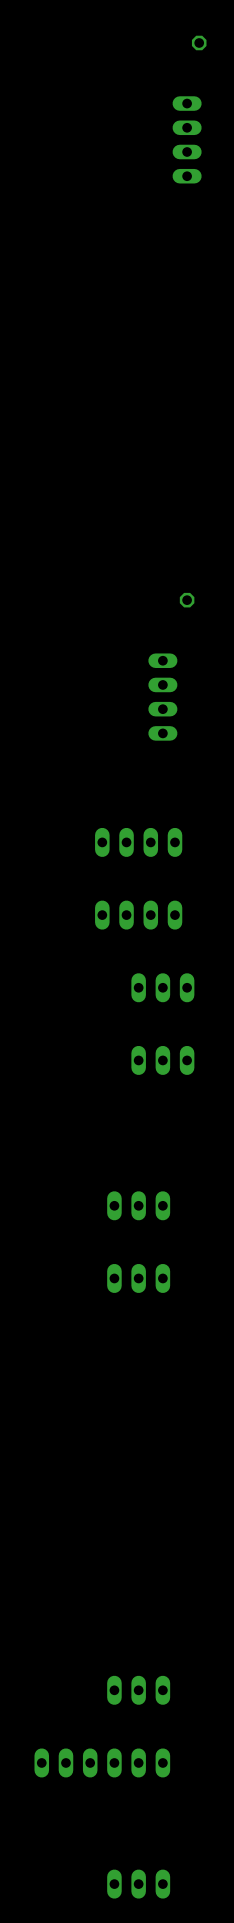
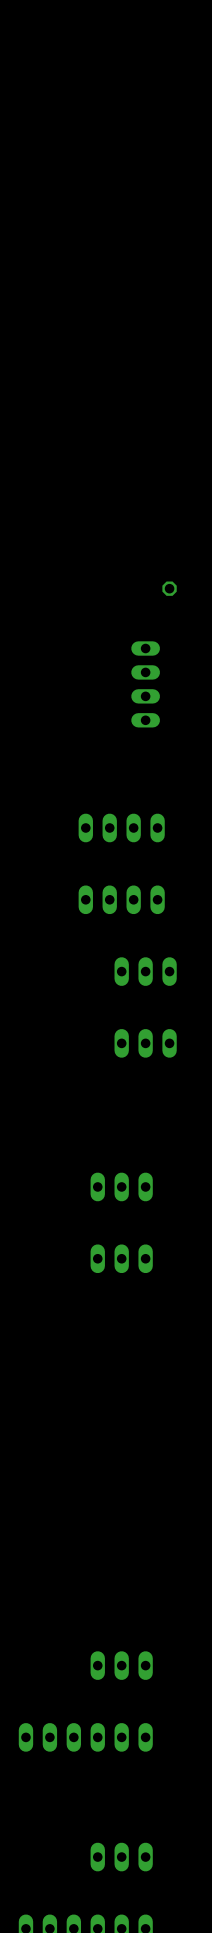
part: (199, 42) -> none
part: (187, 139) -> none

